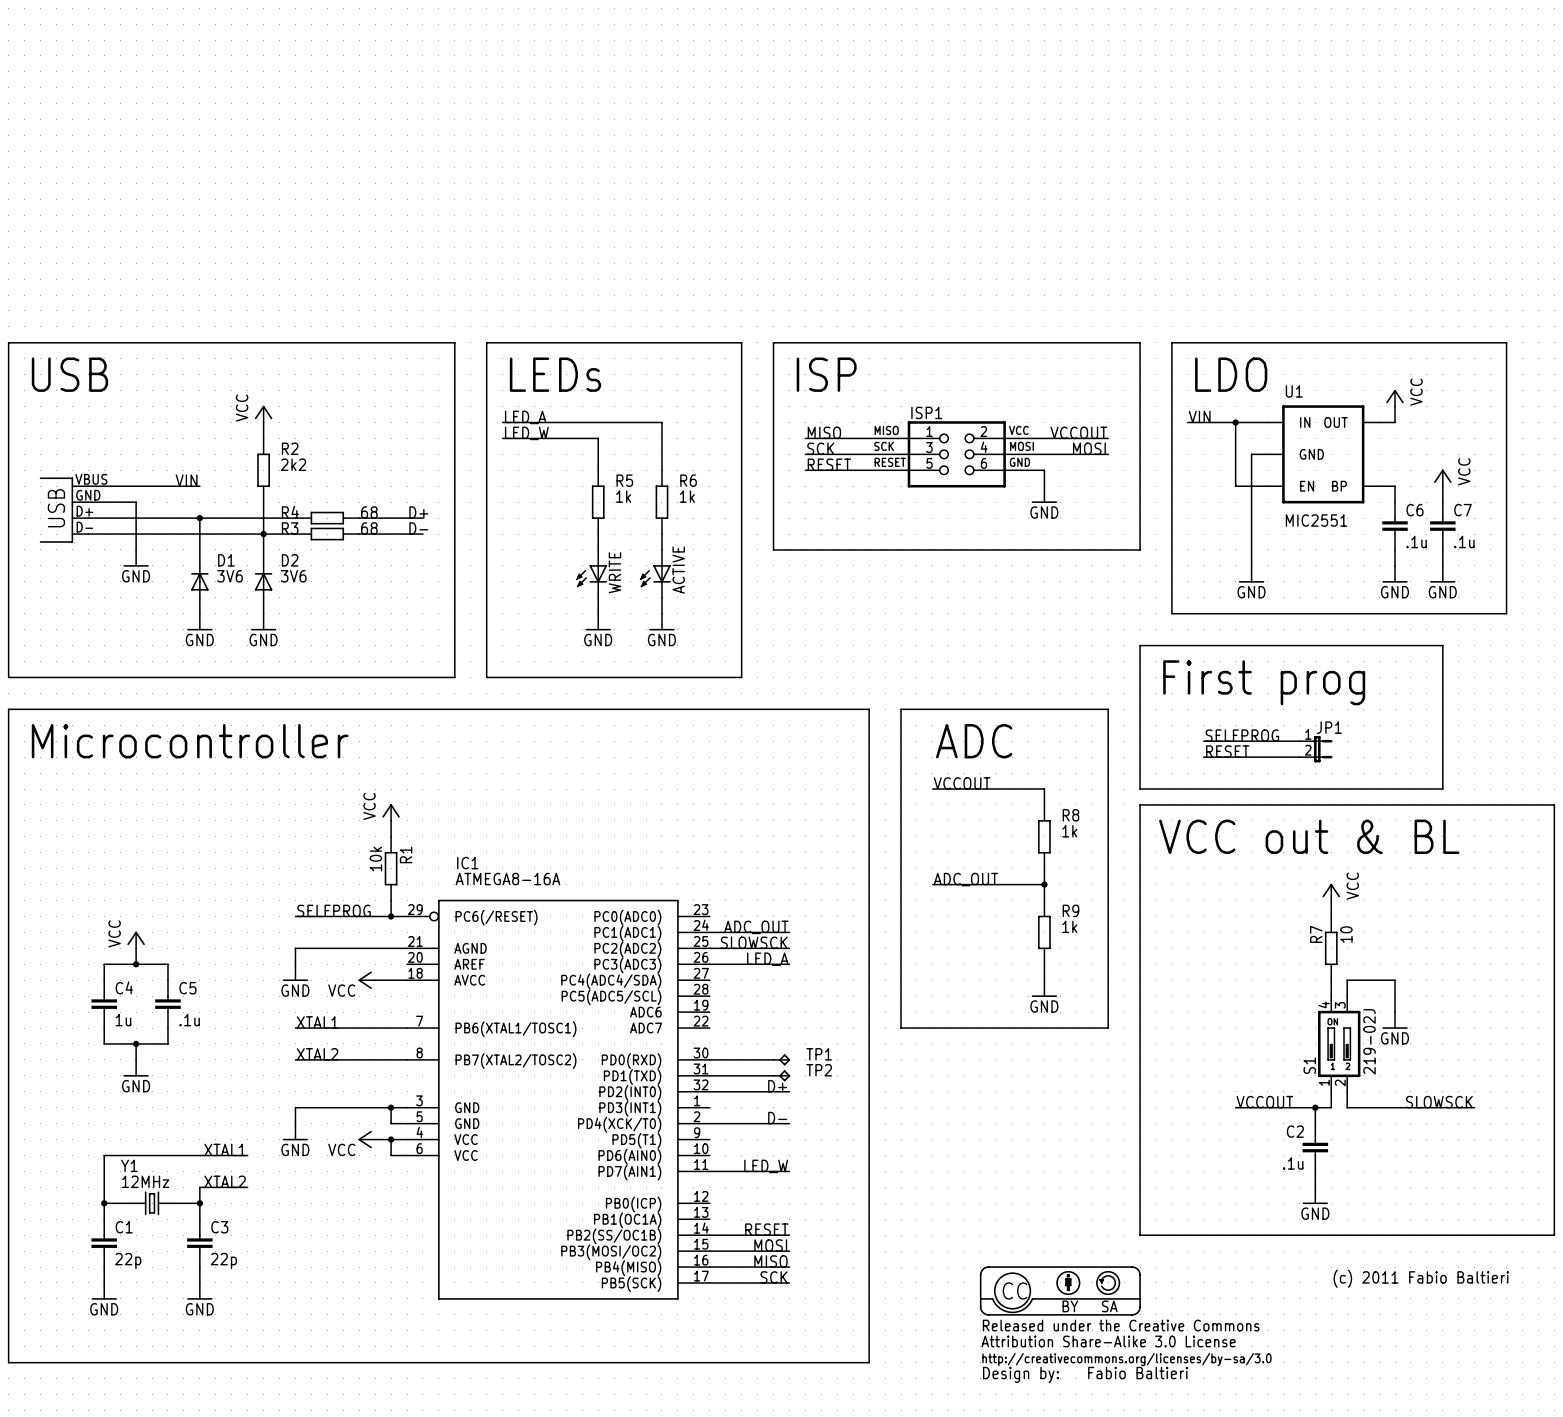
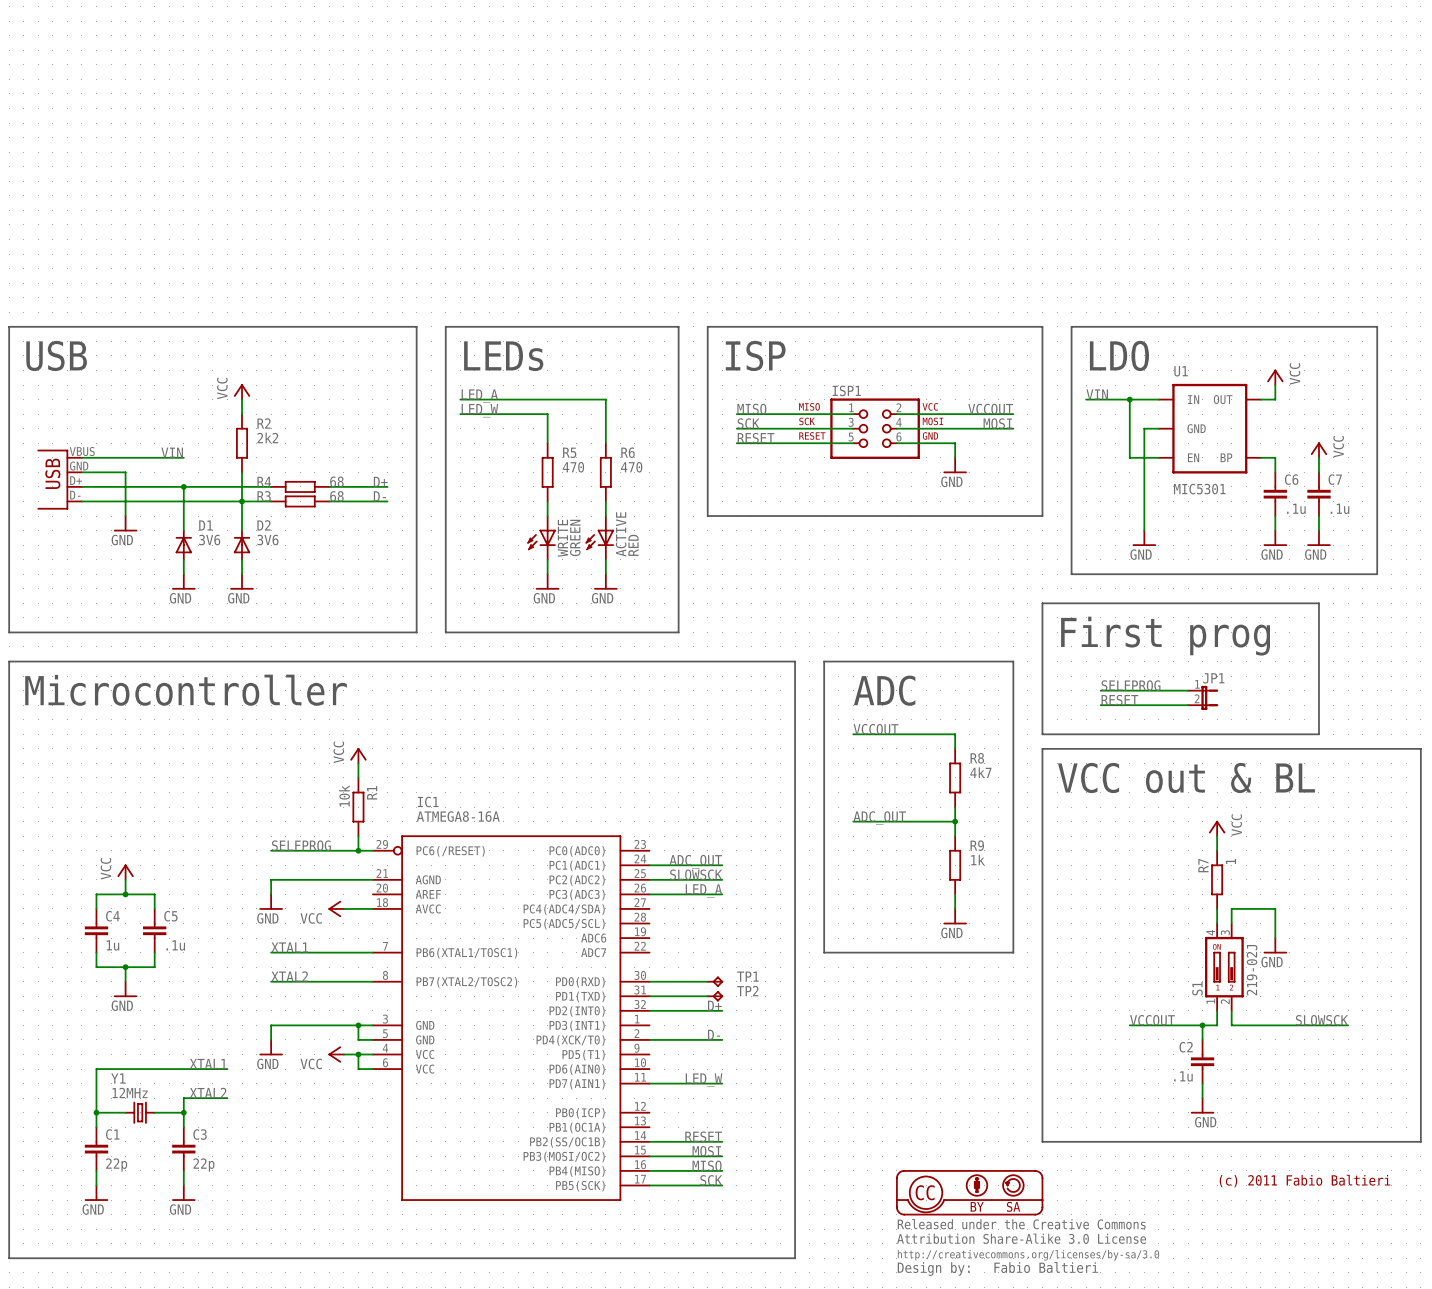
R5 value: 1k (623, 496) -> 470 (573, 467)
R6 value: 1k (687, 496) -> 470 (631, 467)
U1 value: MIC2551 (1316, 520) -> MIC5301 (1199, 489)
WRITE value: none -> GREEN (575, 537)
ACTIVE value: none -> RED (633, 545)
R8 value: 1k (1069, 831) -> 4k7 (980, 772)
R7 value: 10 (1346, 934) -> 1 (1230, 861)

